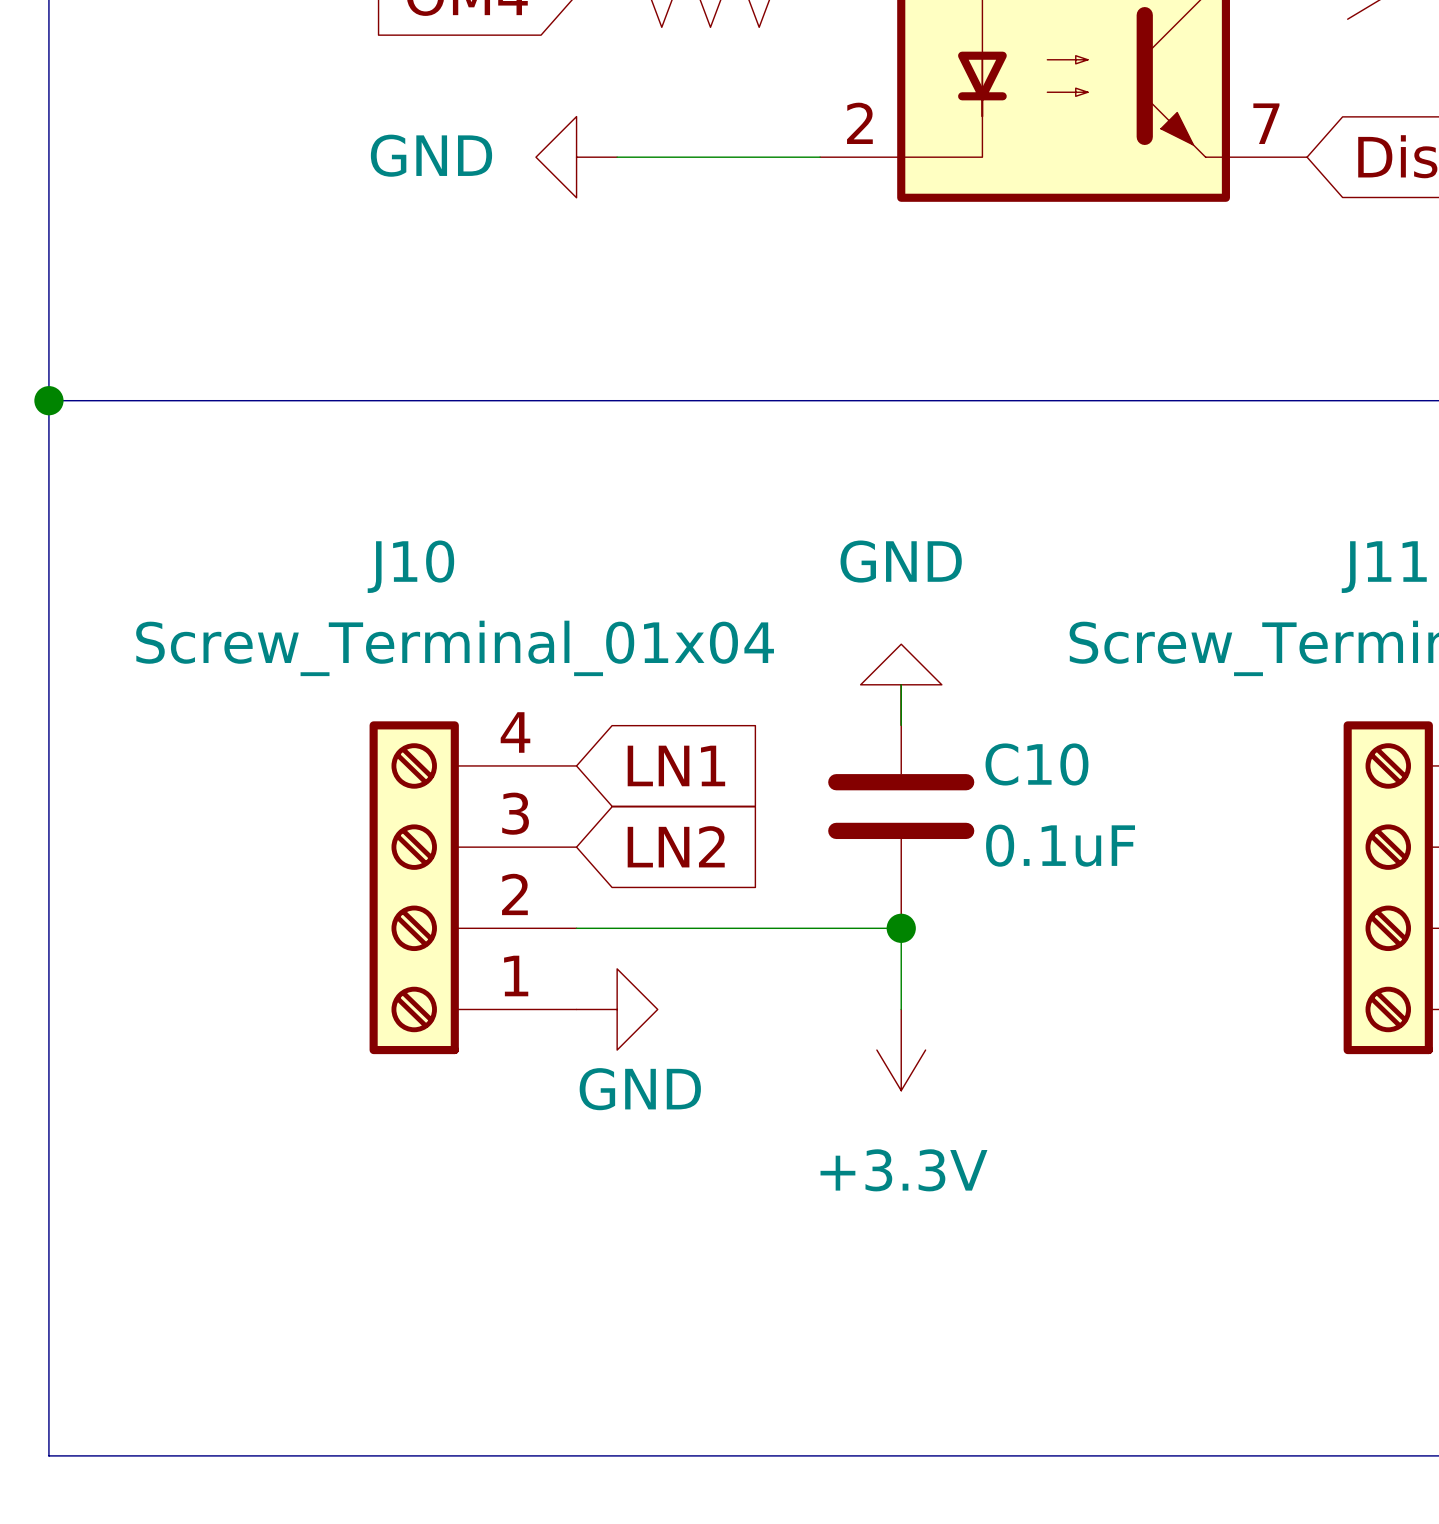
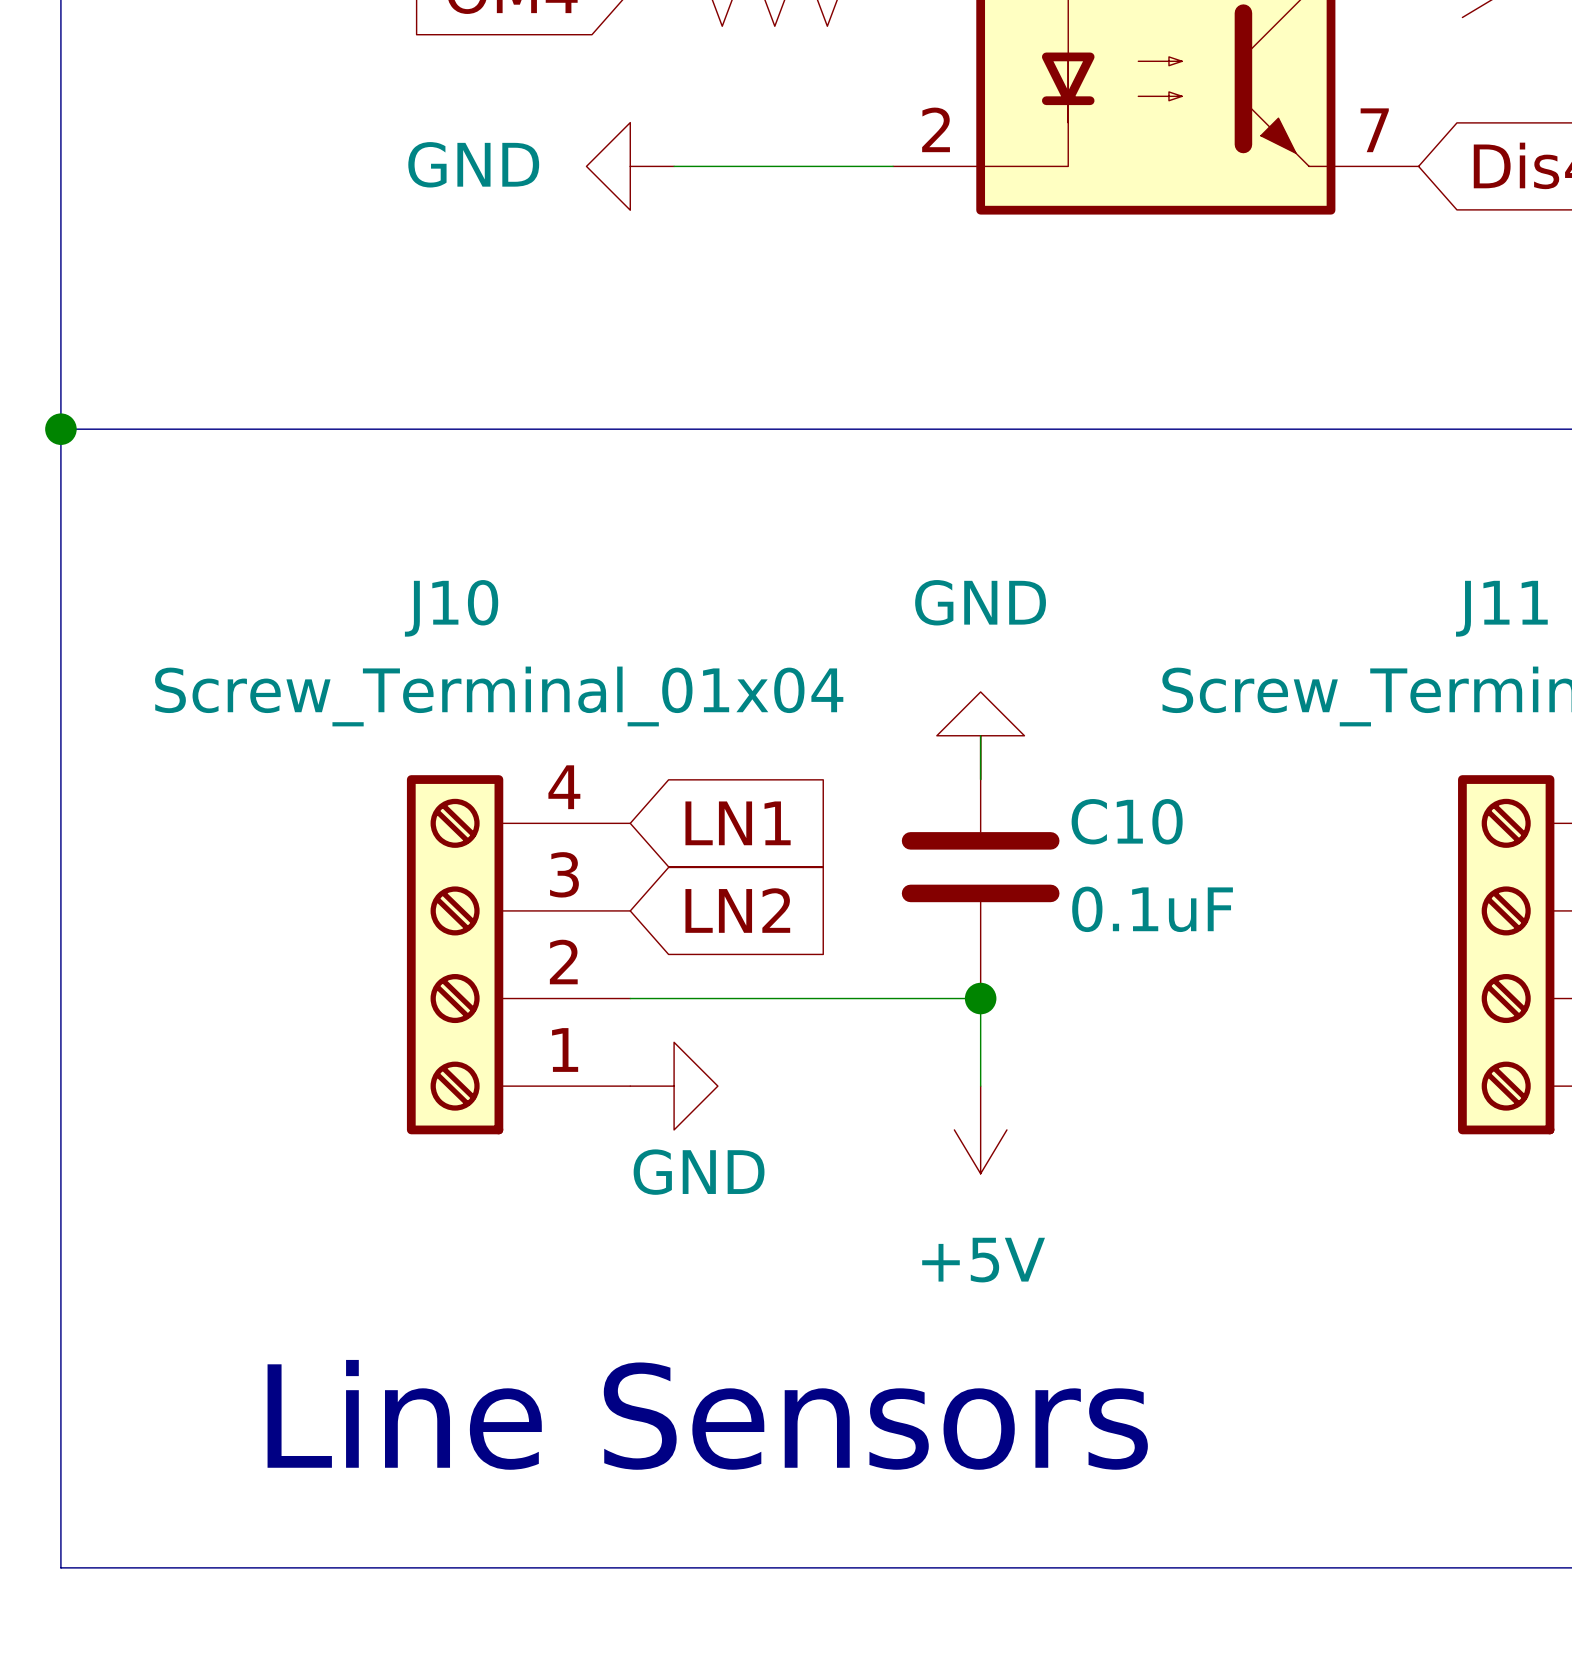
power symbol: +3.3V (901, 1050) -> +5V (980, 1129)
text: none -> Line Sensors (707, 1414)

